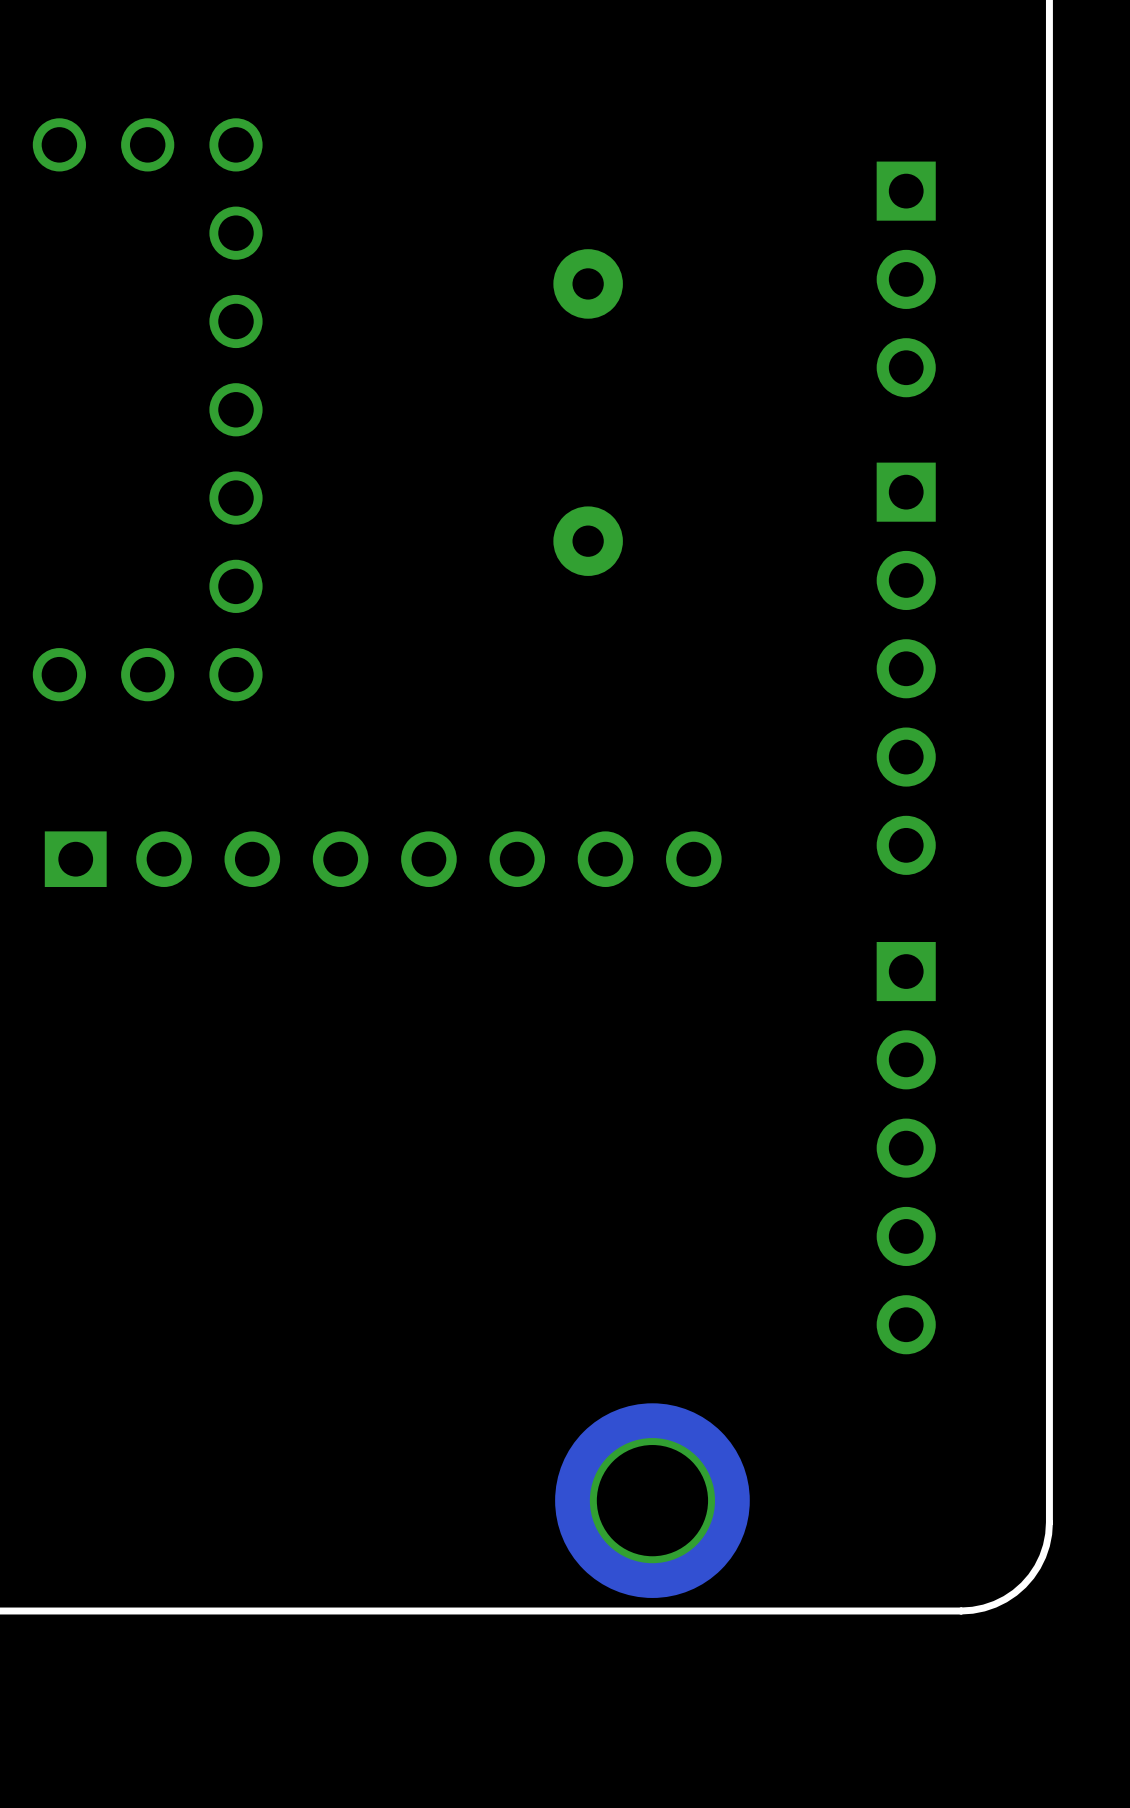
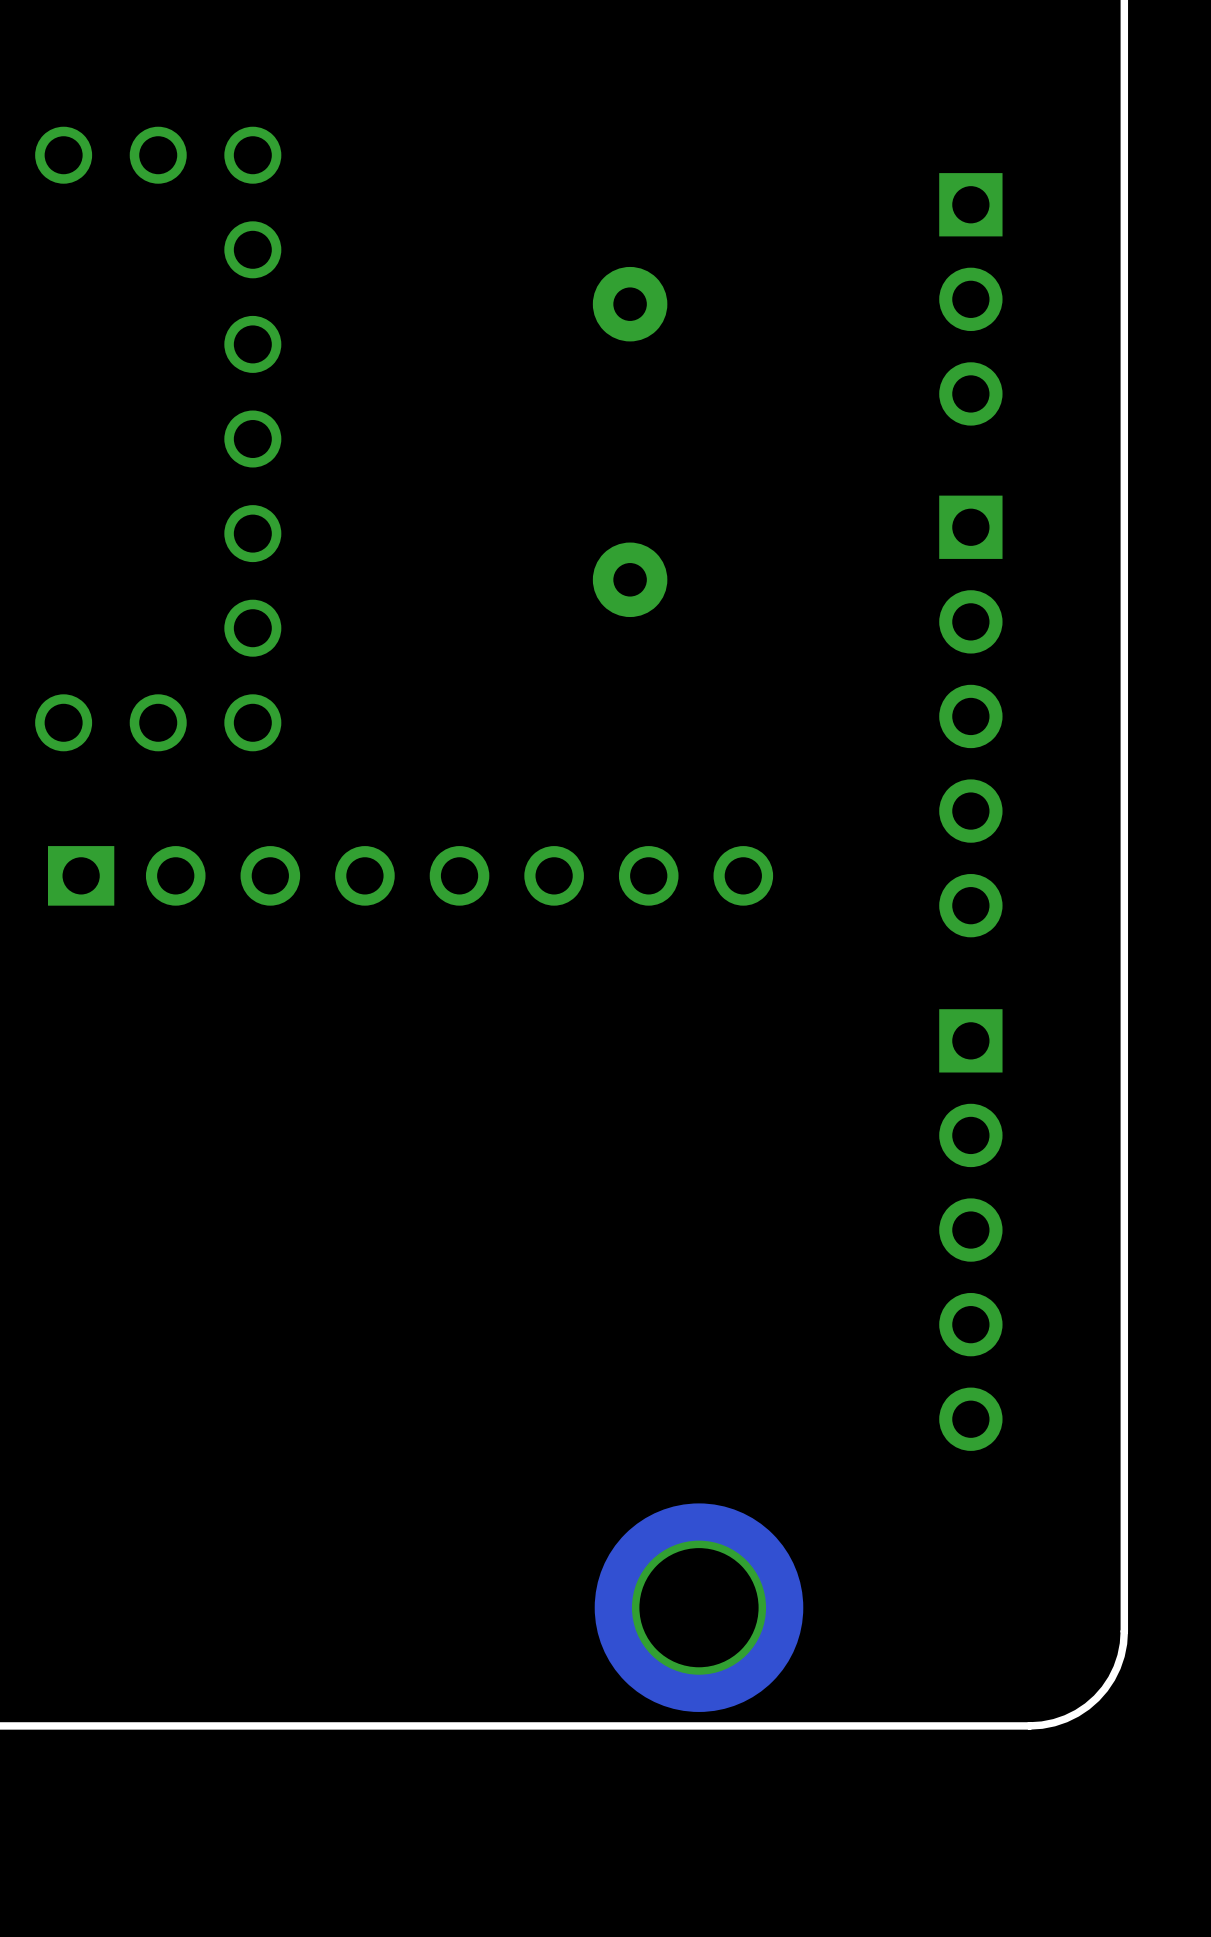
part position: (383, 859) -> (410, 875)

